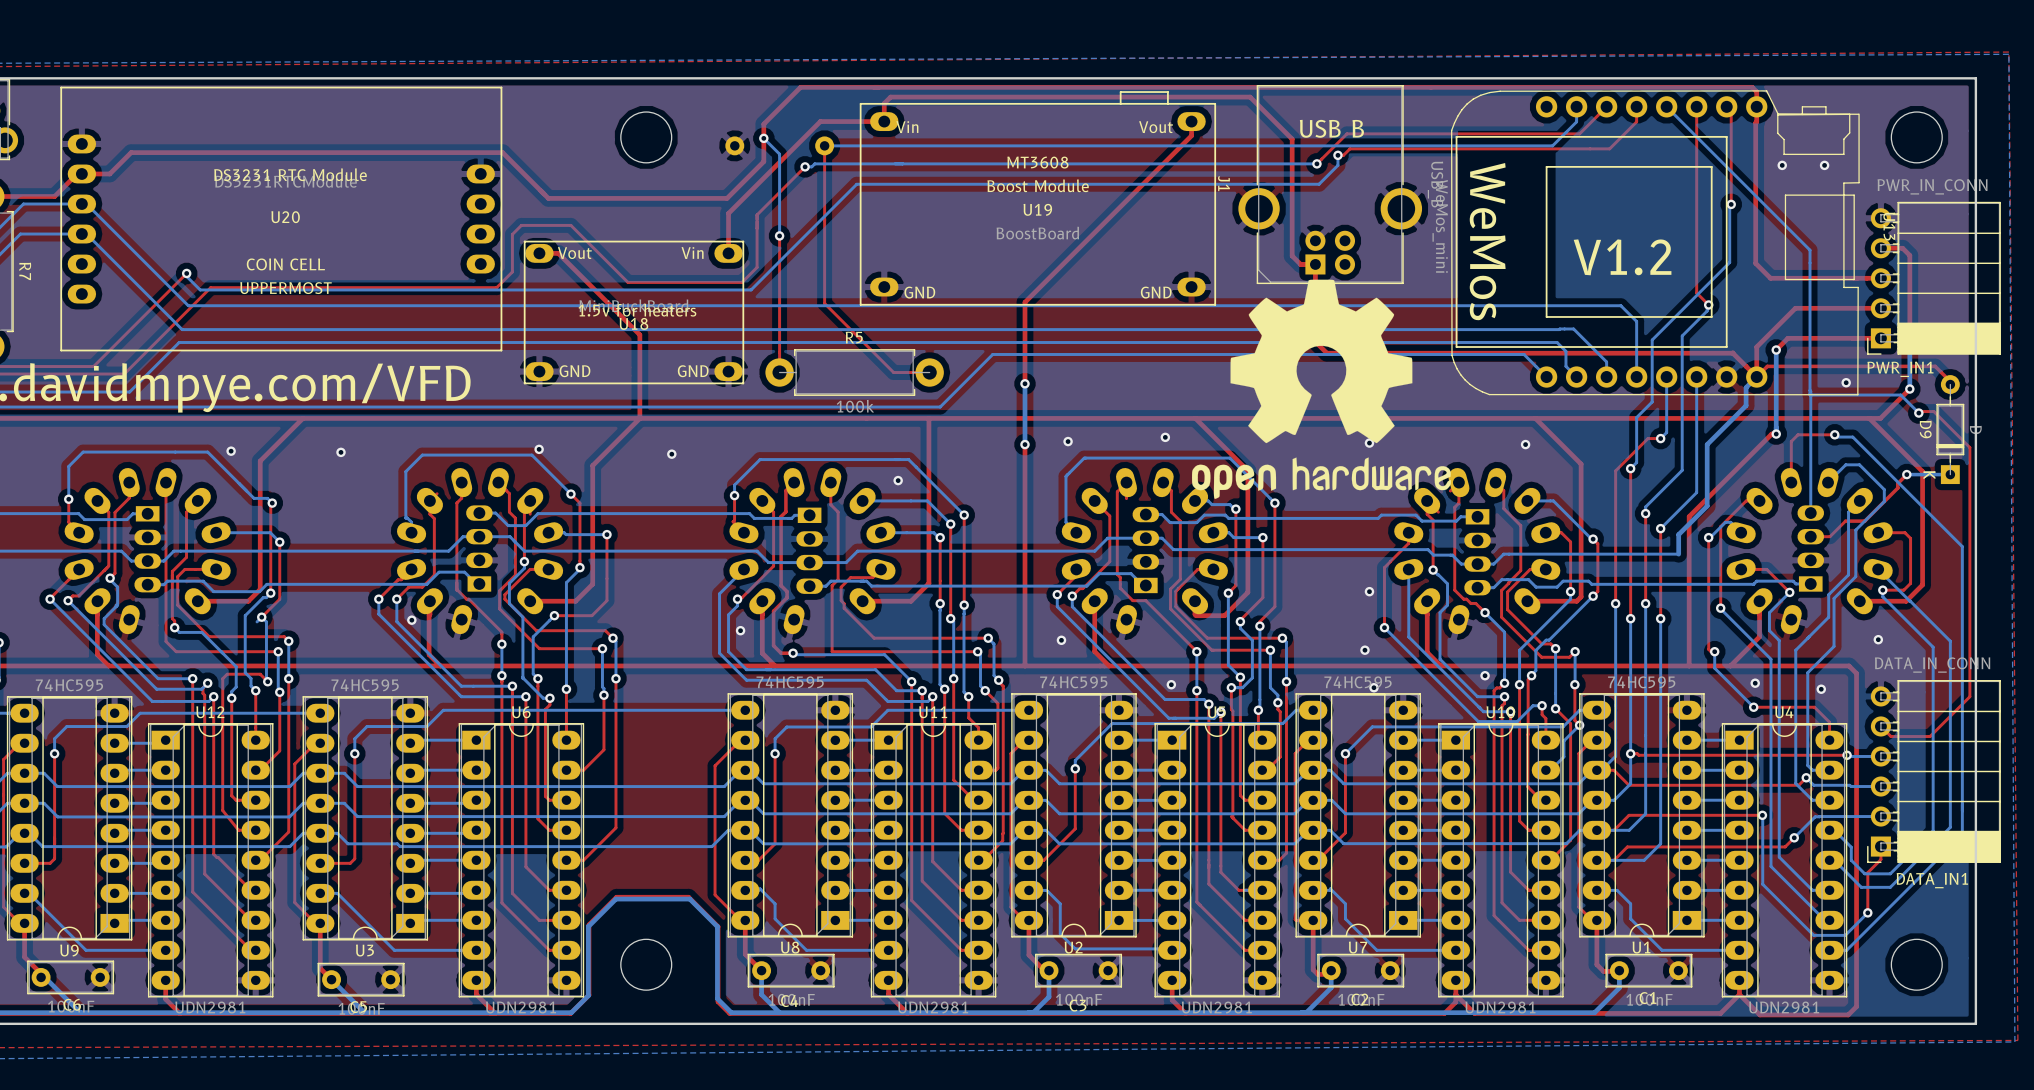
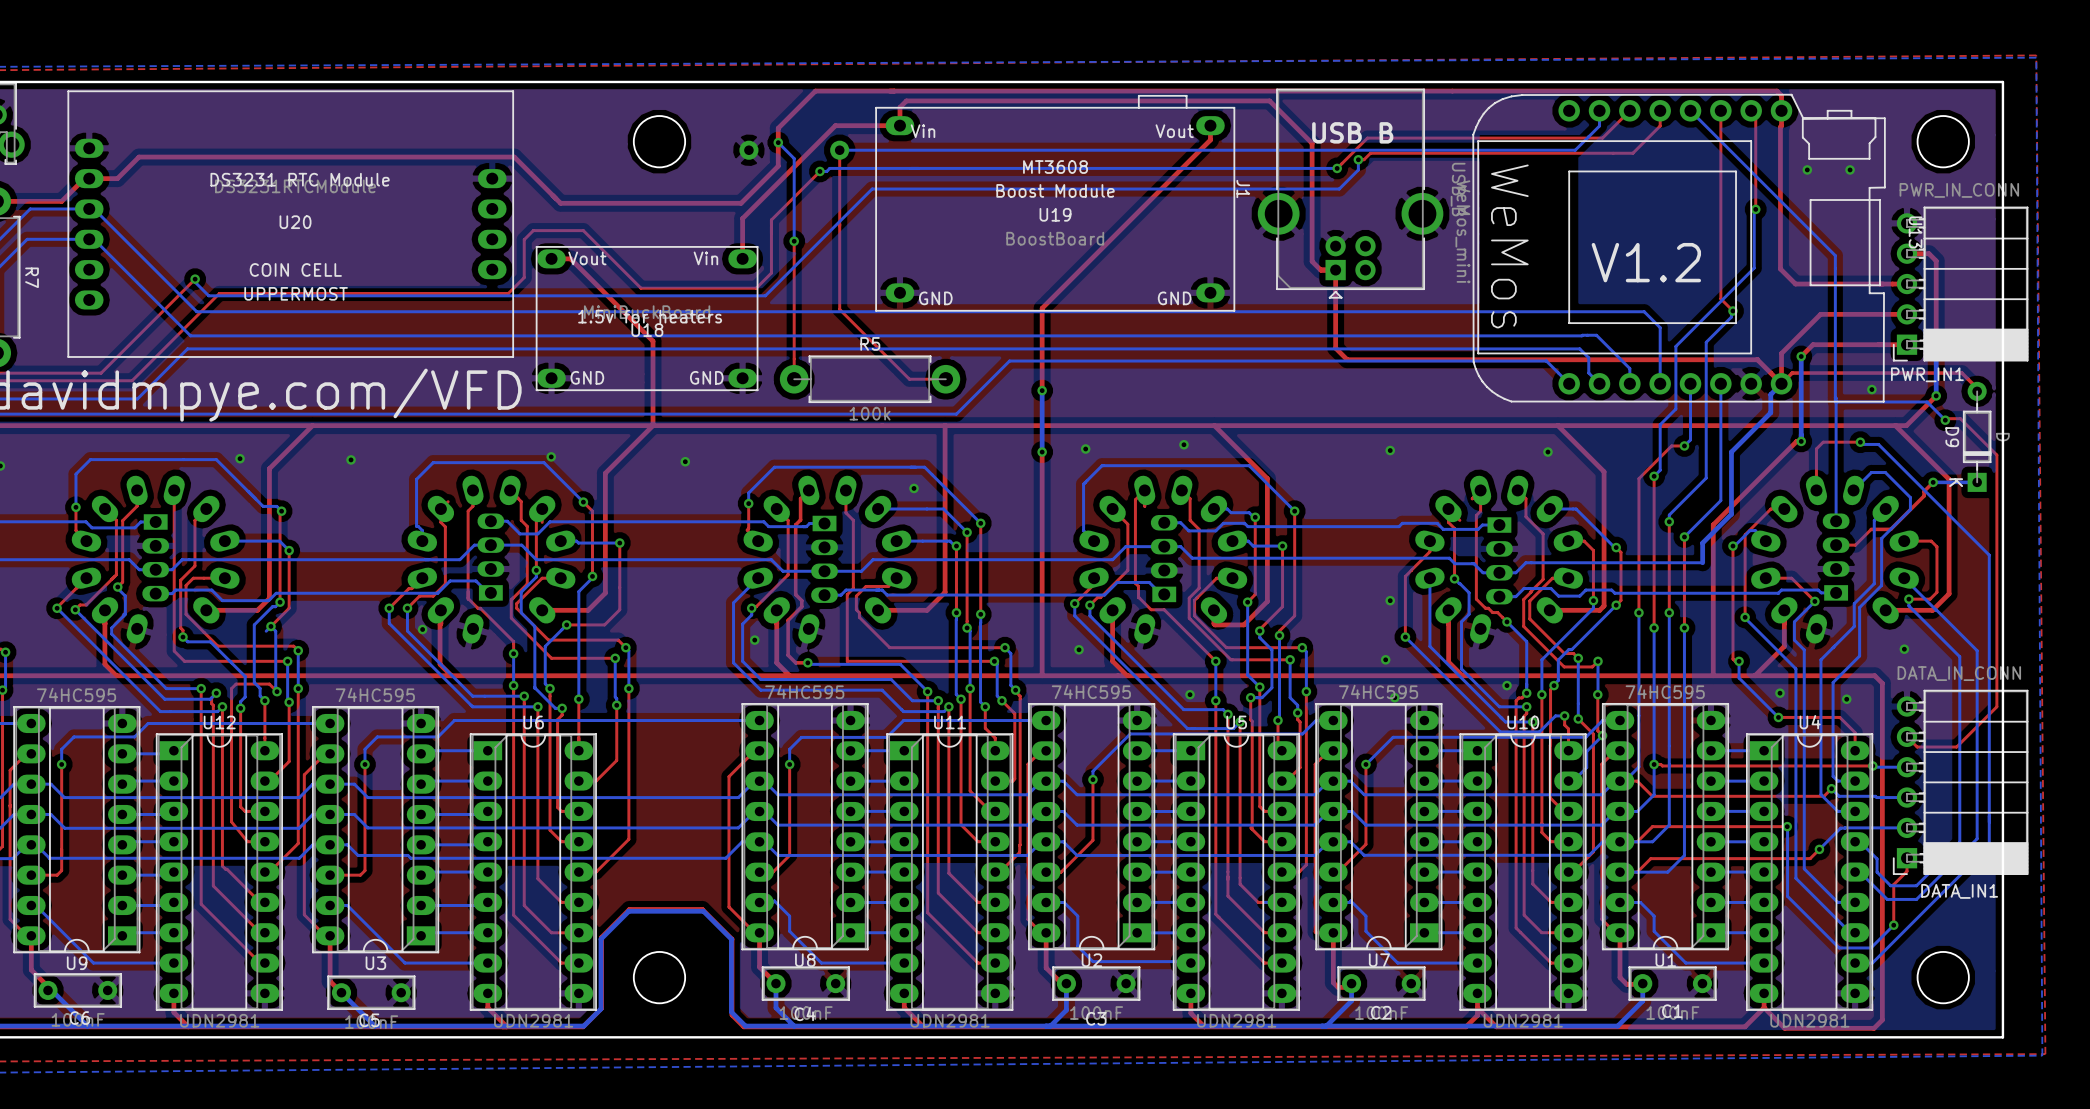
drawing: [1191, 279, 1451, 499] -> none

